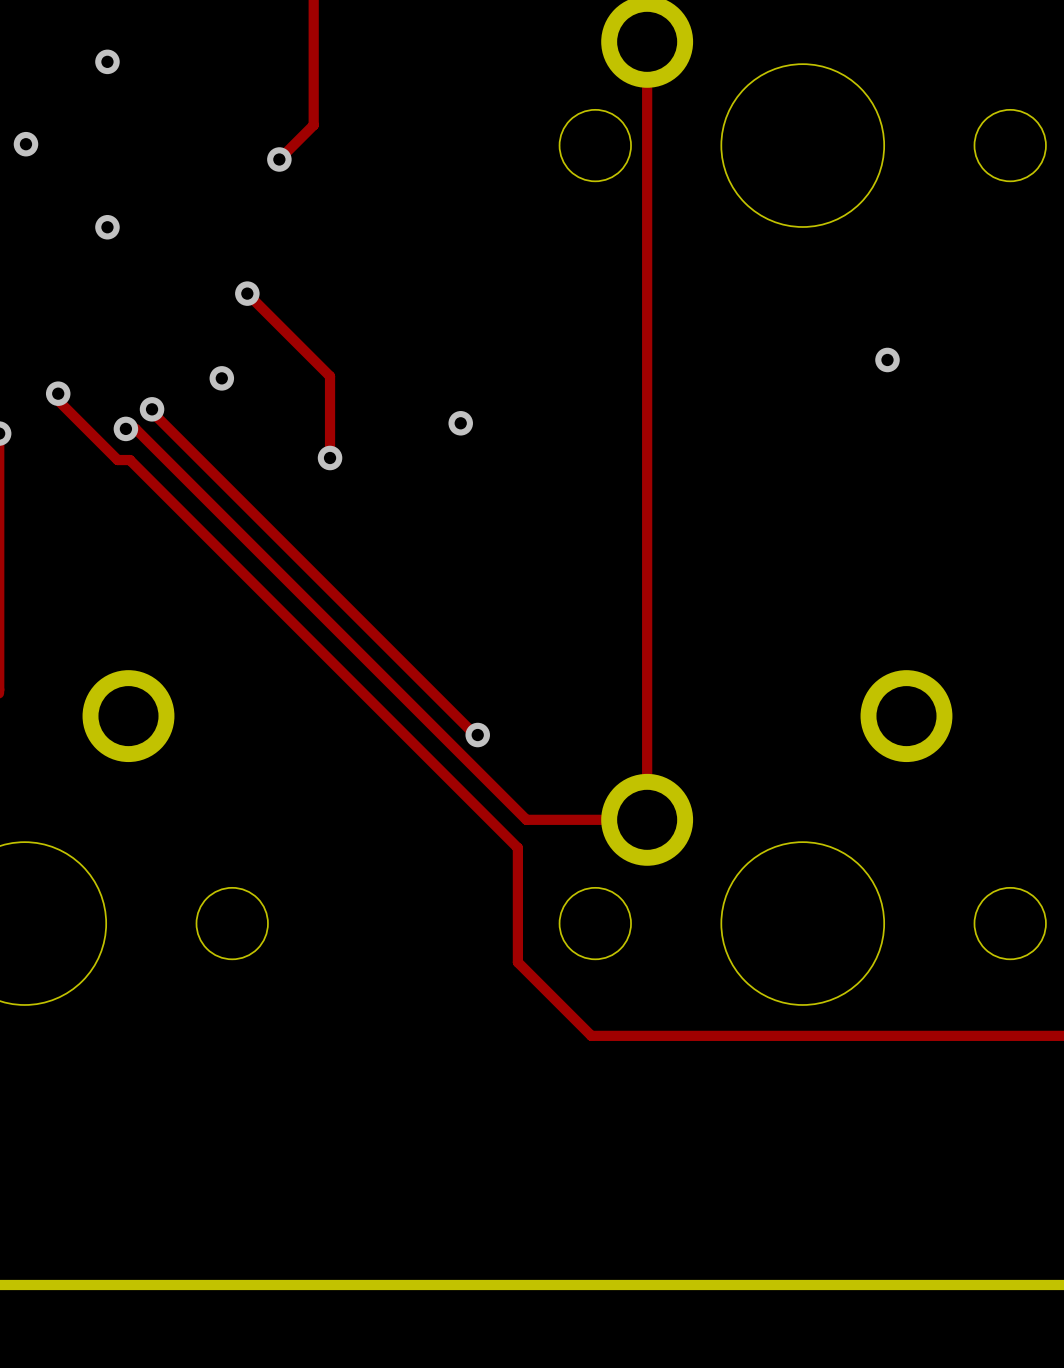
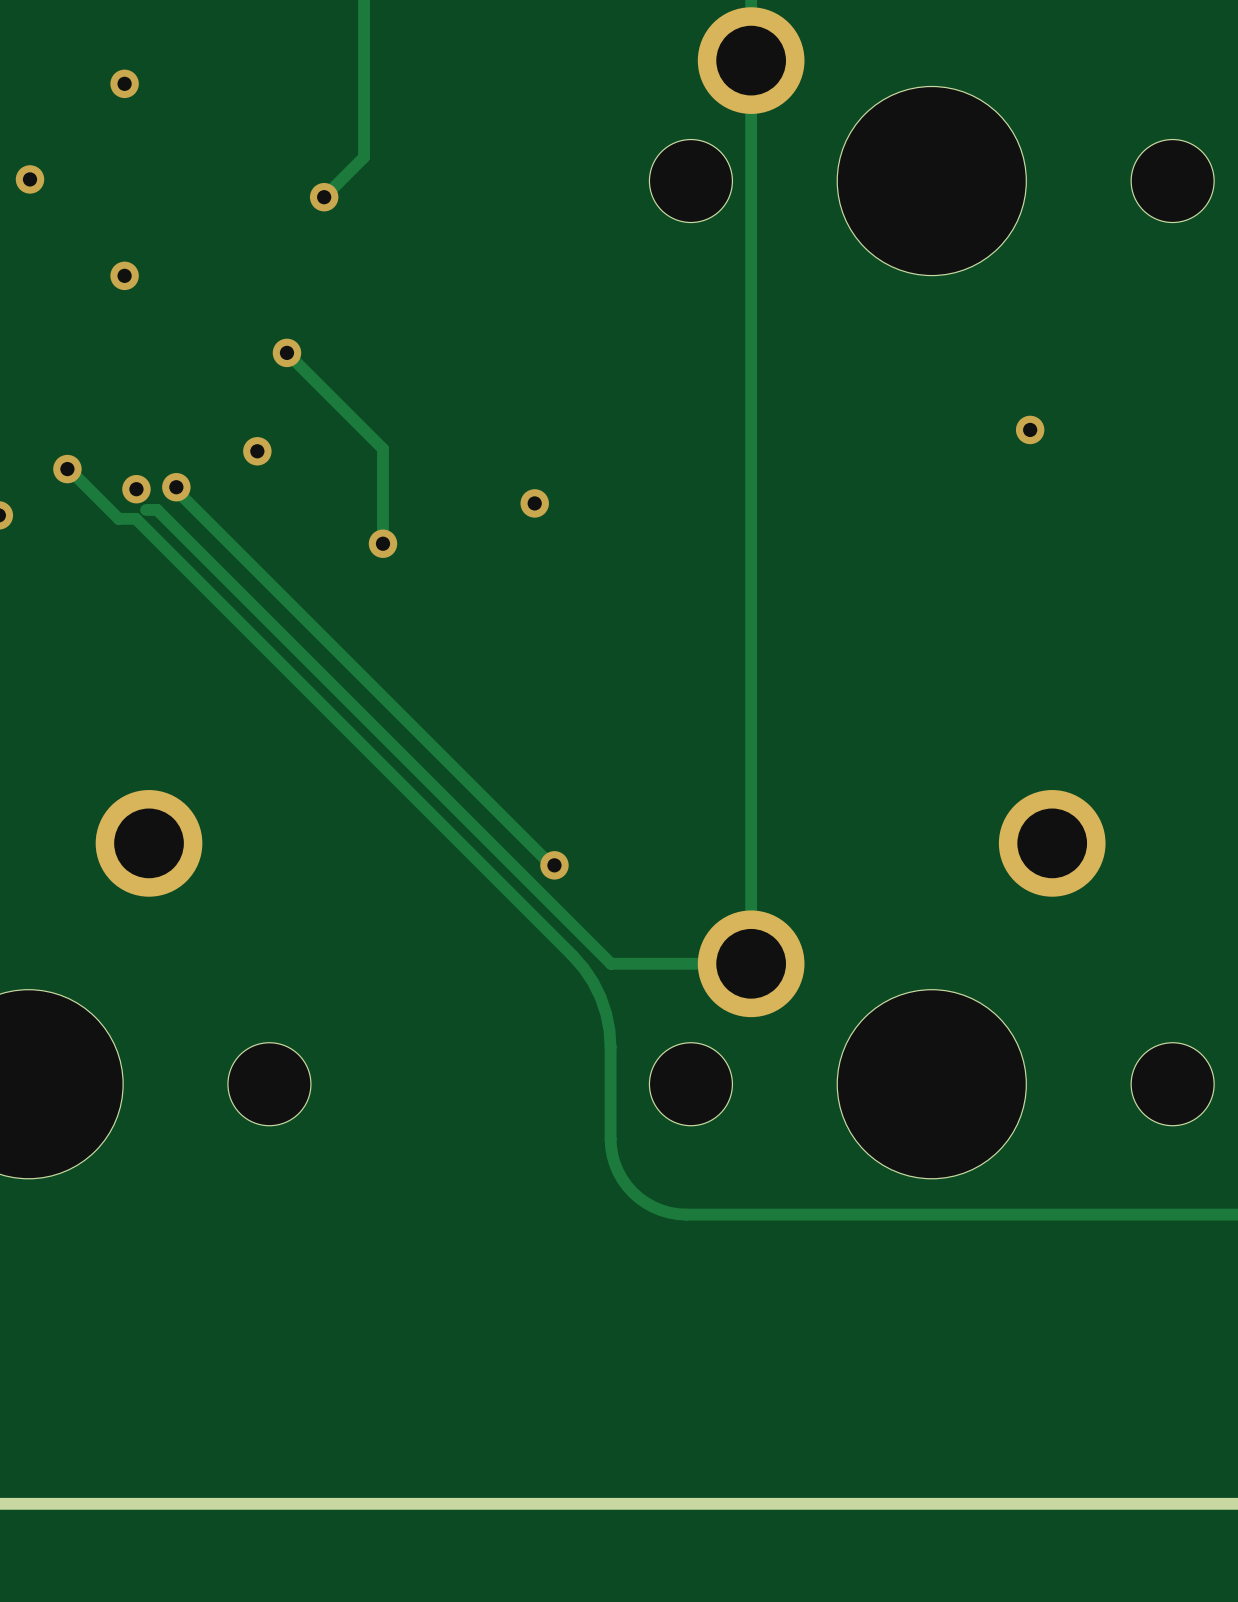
track: (58, 393) (58, 400) (117, 460) (129, 460) (517, 848) (517, 962) (591, 1035) -> (63, 465) (118, 518) (135, 518) (583, 968) (600, 997) (609, 1030) (611, 1147) (618, 1171) (627, 1186) (646, 1202) (661, 1210) (686, 1214)
via position: (125, 428) -> (136, 489)

